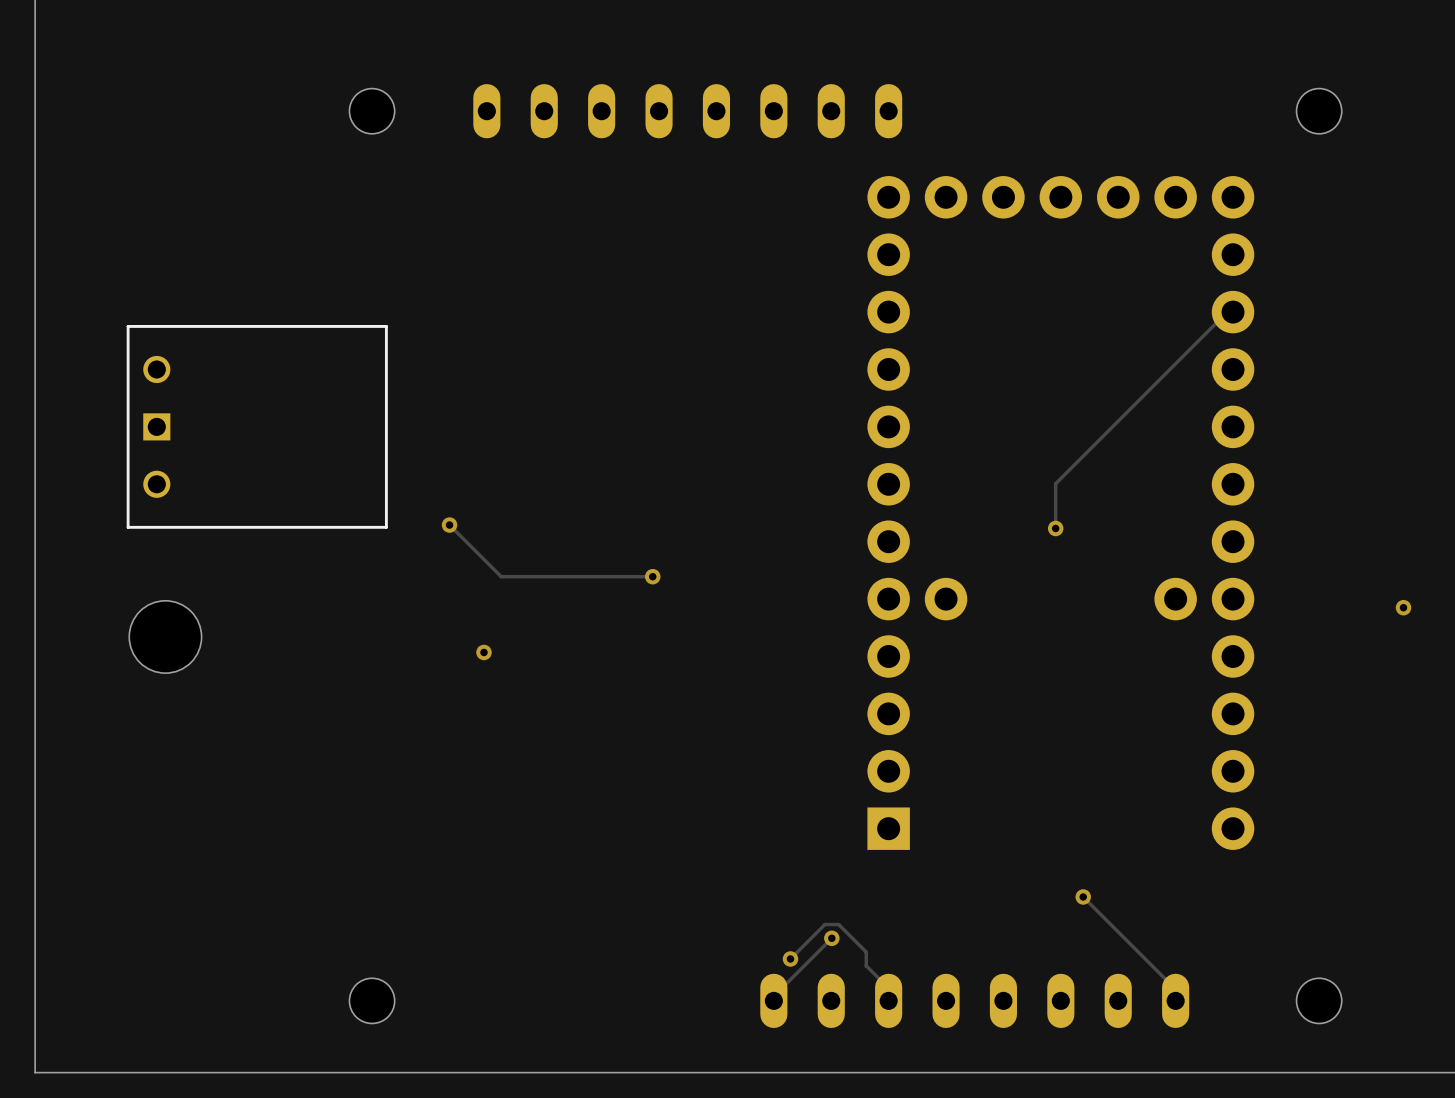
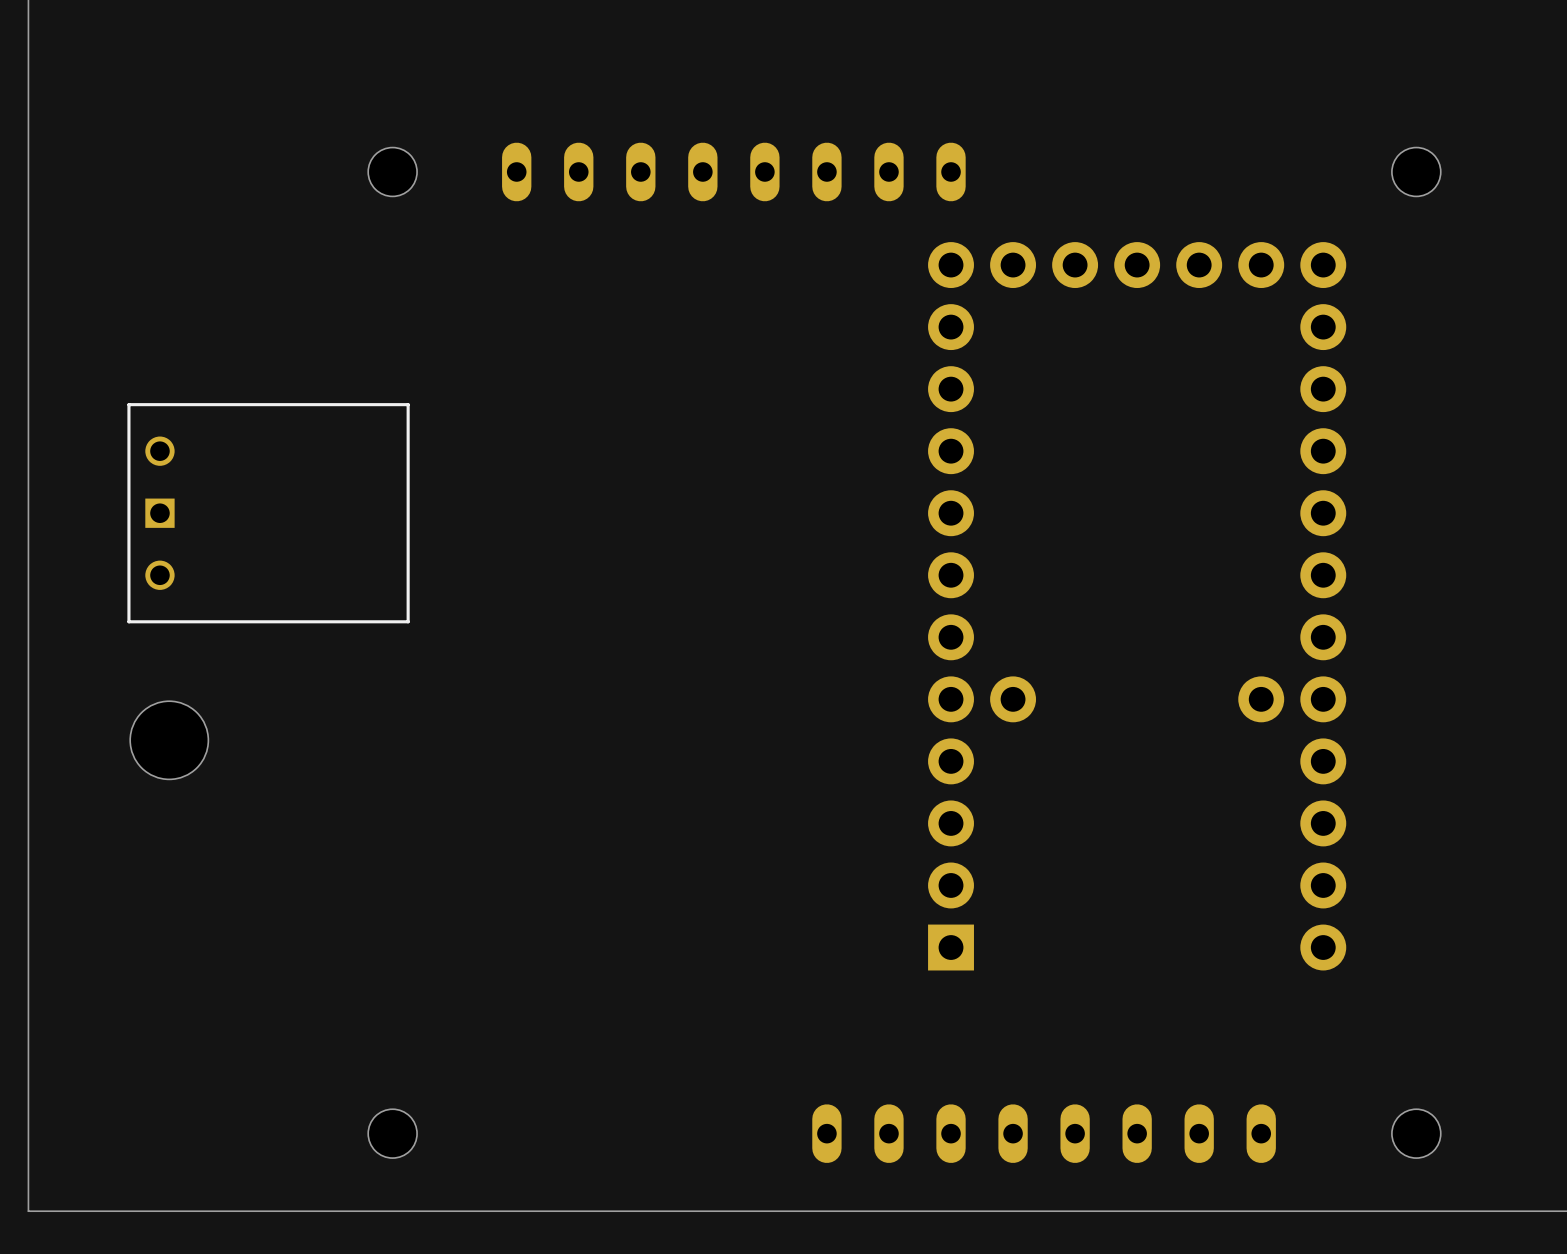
track: (1233, 312) (1231, 314) (1224, 314) (1055, 483) (1055, 528) -> none
track: (449, 525) (501, 576) (652, 576) -> none
via: (449, 525) -> none
via: (1055, 528) -> none
via: (652, 576) -> none
via: (1403, 607) -> none
via: (483, 652) -> none
track: (1083, 896) (1172, 986) (1172, 1000) (1175, 1000) -> none
via: (1083, 896) -> none
track: (831, 938) (776, 993) (776, 1000) (773, 1000) -> none
via: (831, 938) -> none
track: (790, 958) (824, 924) (838, 924) (866, 952) (866, 965) (886, 986) (886, 1000) (888, 1000) -> none
via: (790, 958) -> none

